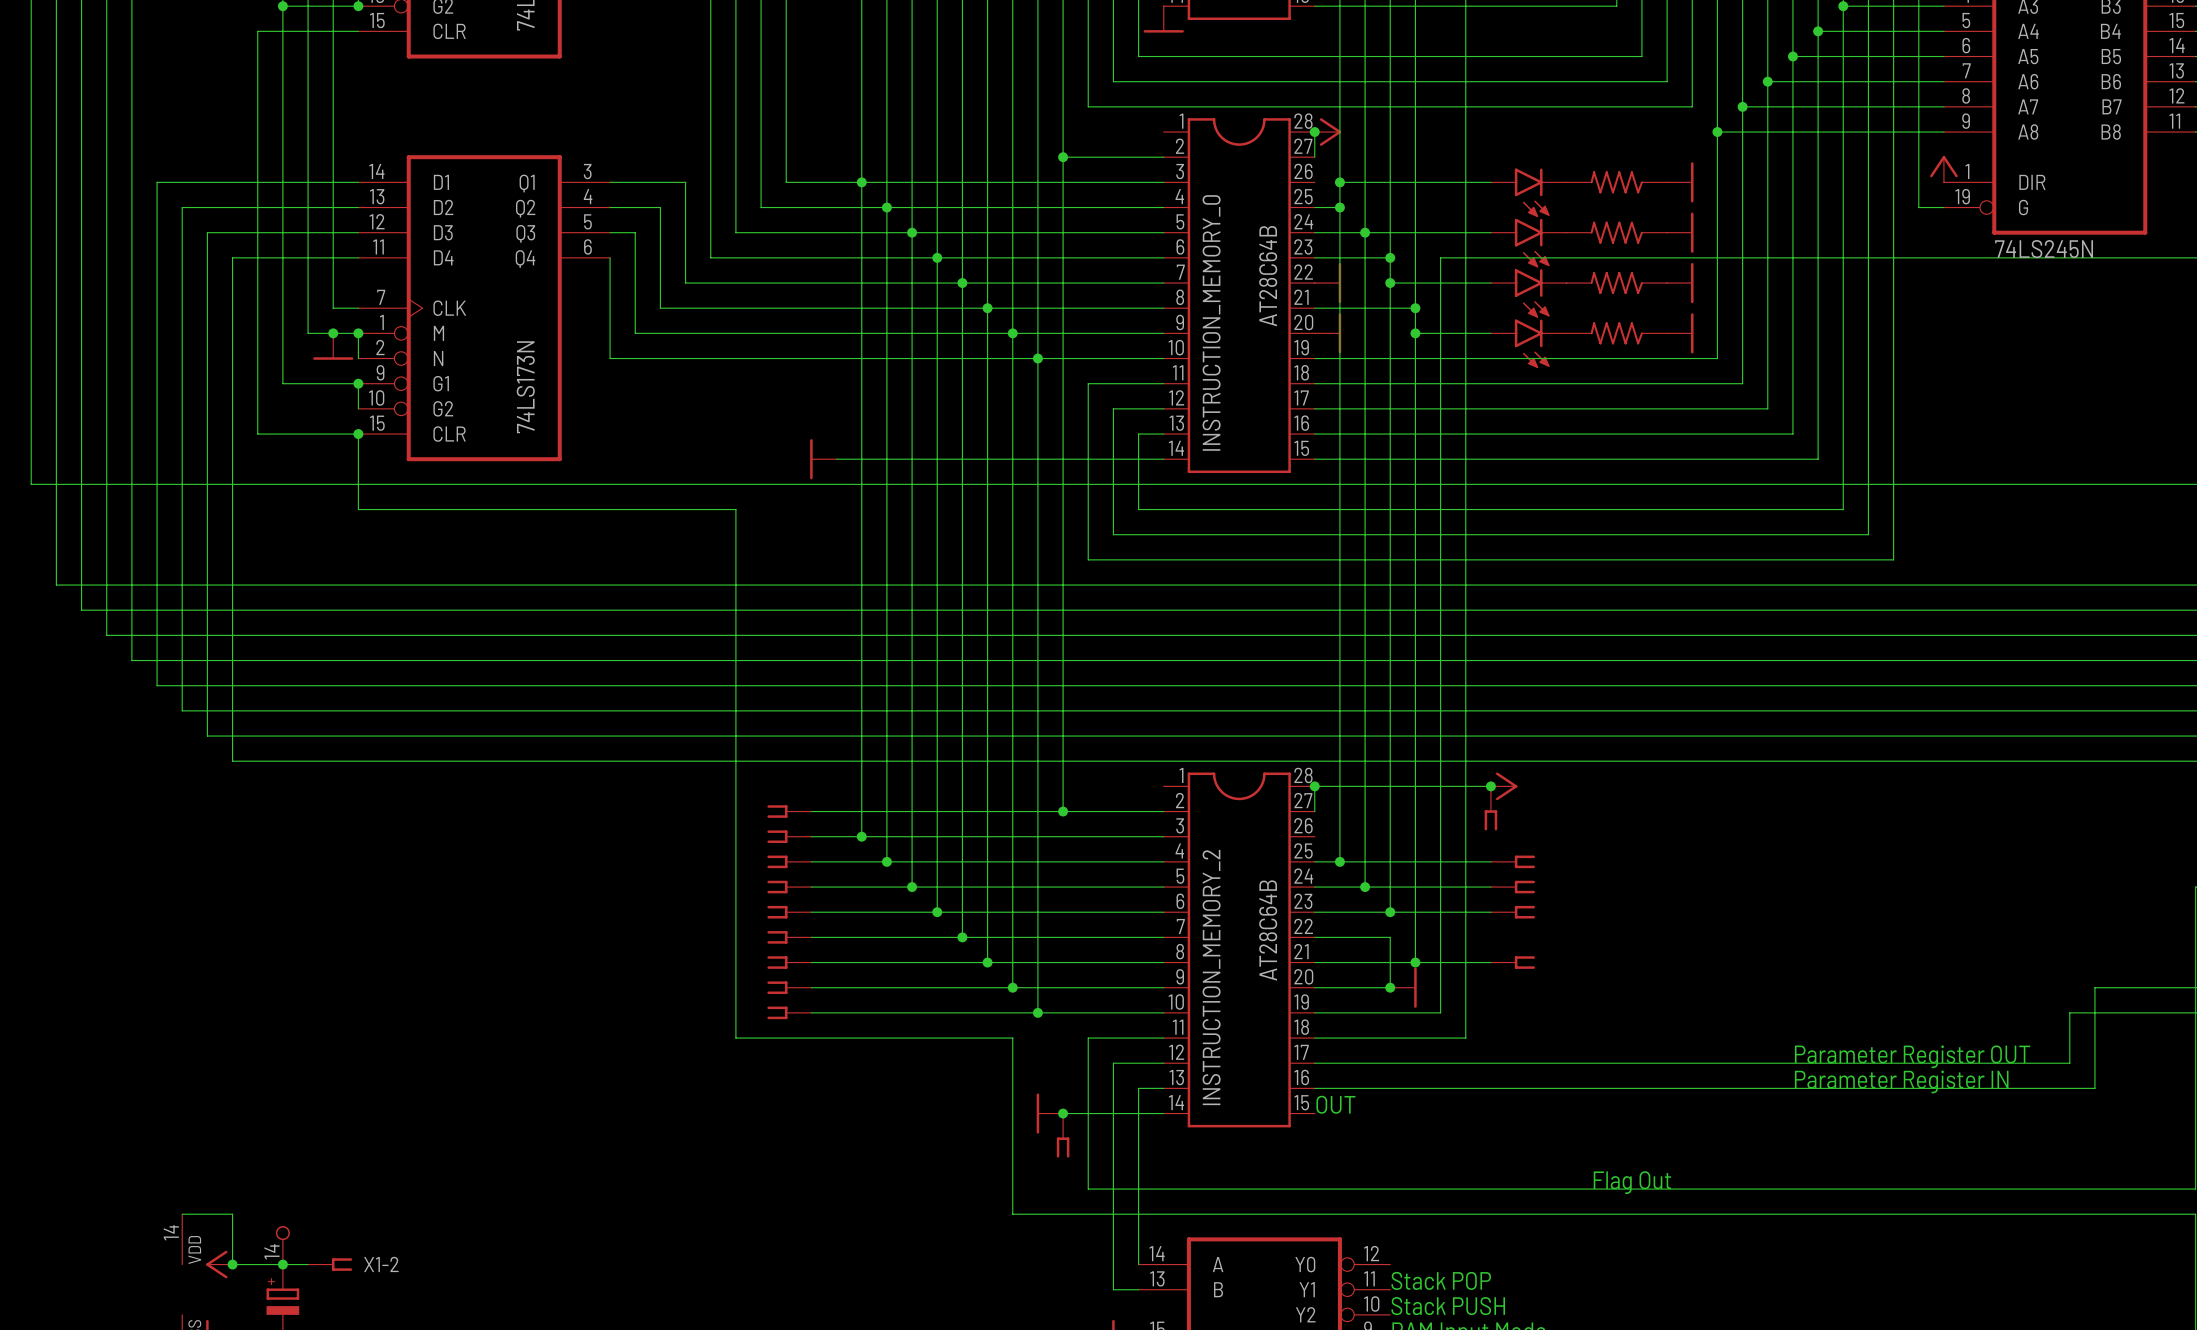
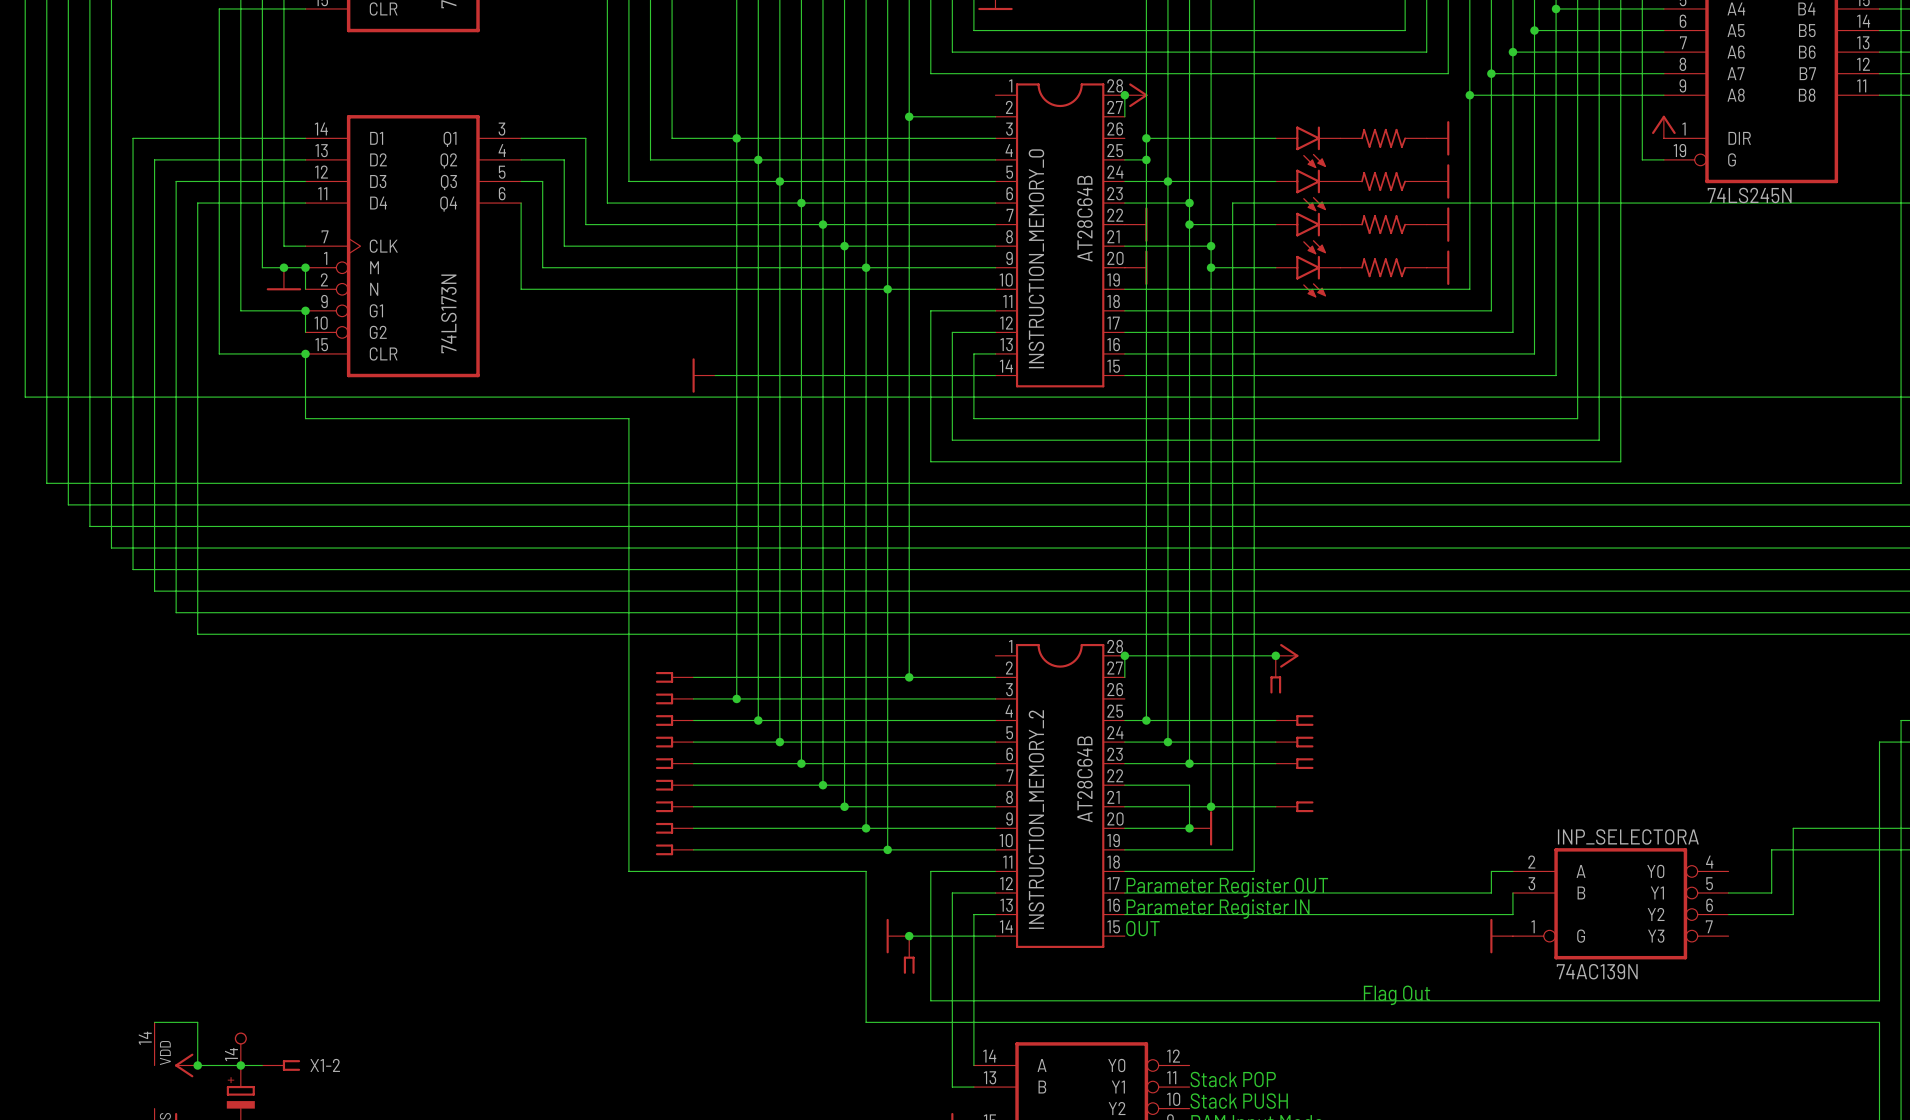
text: none -> Parameter Register OUT (1227, 887)
text: Parameter Register OUT (1912, 1056) -> none
wire: (1742, 1063) (2019, 1063) -> (1491, 893) (1491, 871) (1512, 871)
INP_SELECTORA: none -> 74AC139N (1620, 903)
text: none -> Parameter Register IN (1218, 909)
text: Parameter Register IN (1901, 1081) -> none
wire: (1767, 1088) (2019, 1088) -> (1512, 914) (1512, 893)
power symbol: none -> (1501, 936)

